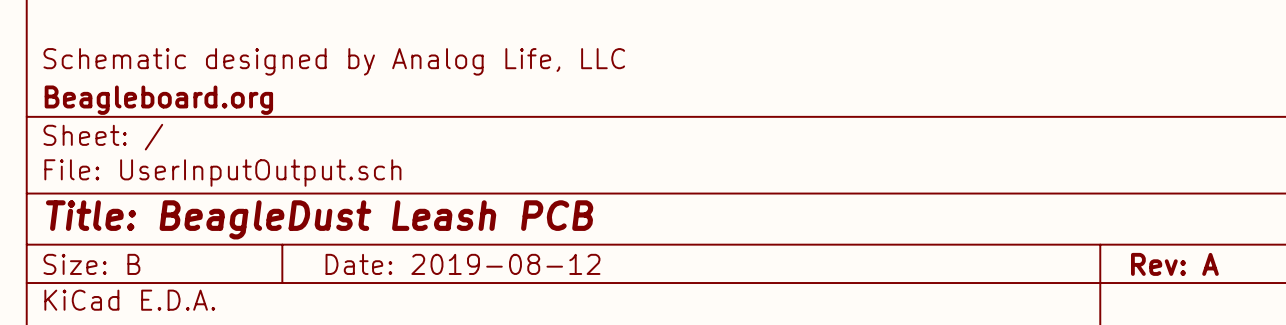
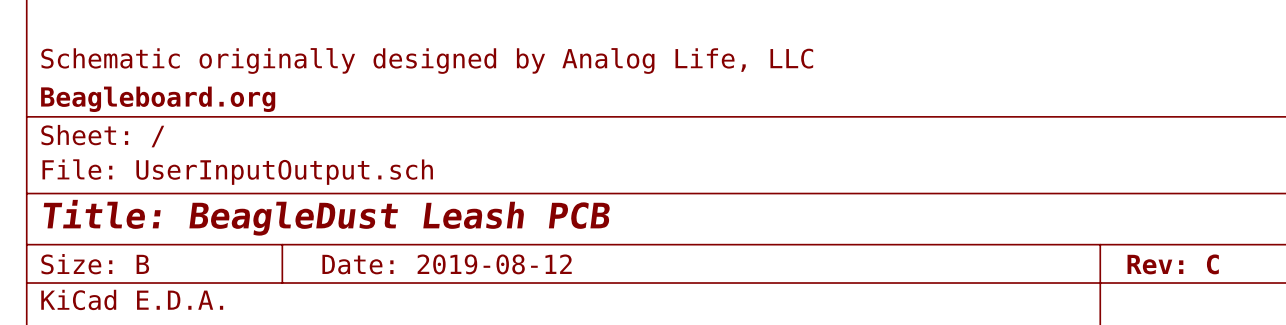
title block: Schematic designed by Analog Life, LLC (334, 61) -> Schematic originally designed by Analog Life, LLC (427, 60)
title block: Rev: A (1174, 264) -> Rev: C (1173, 264)

